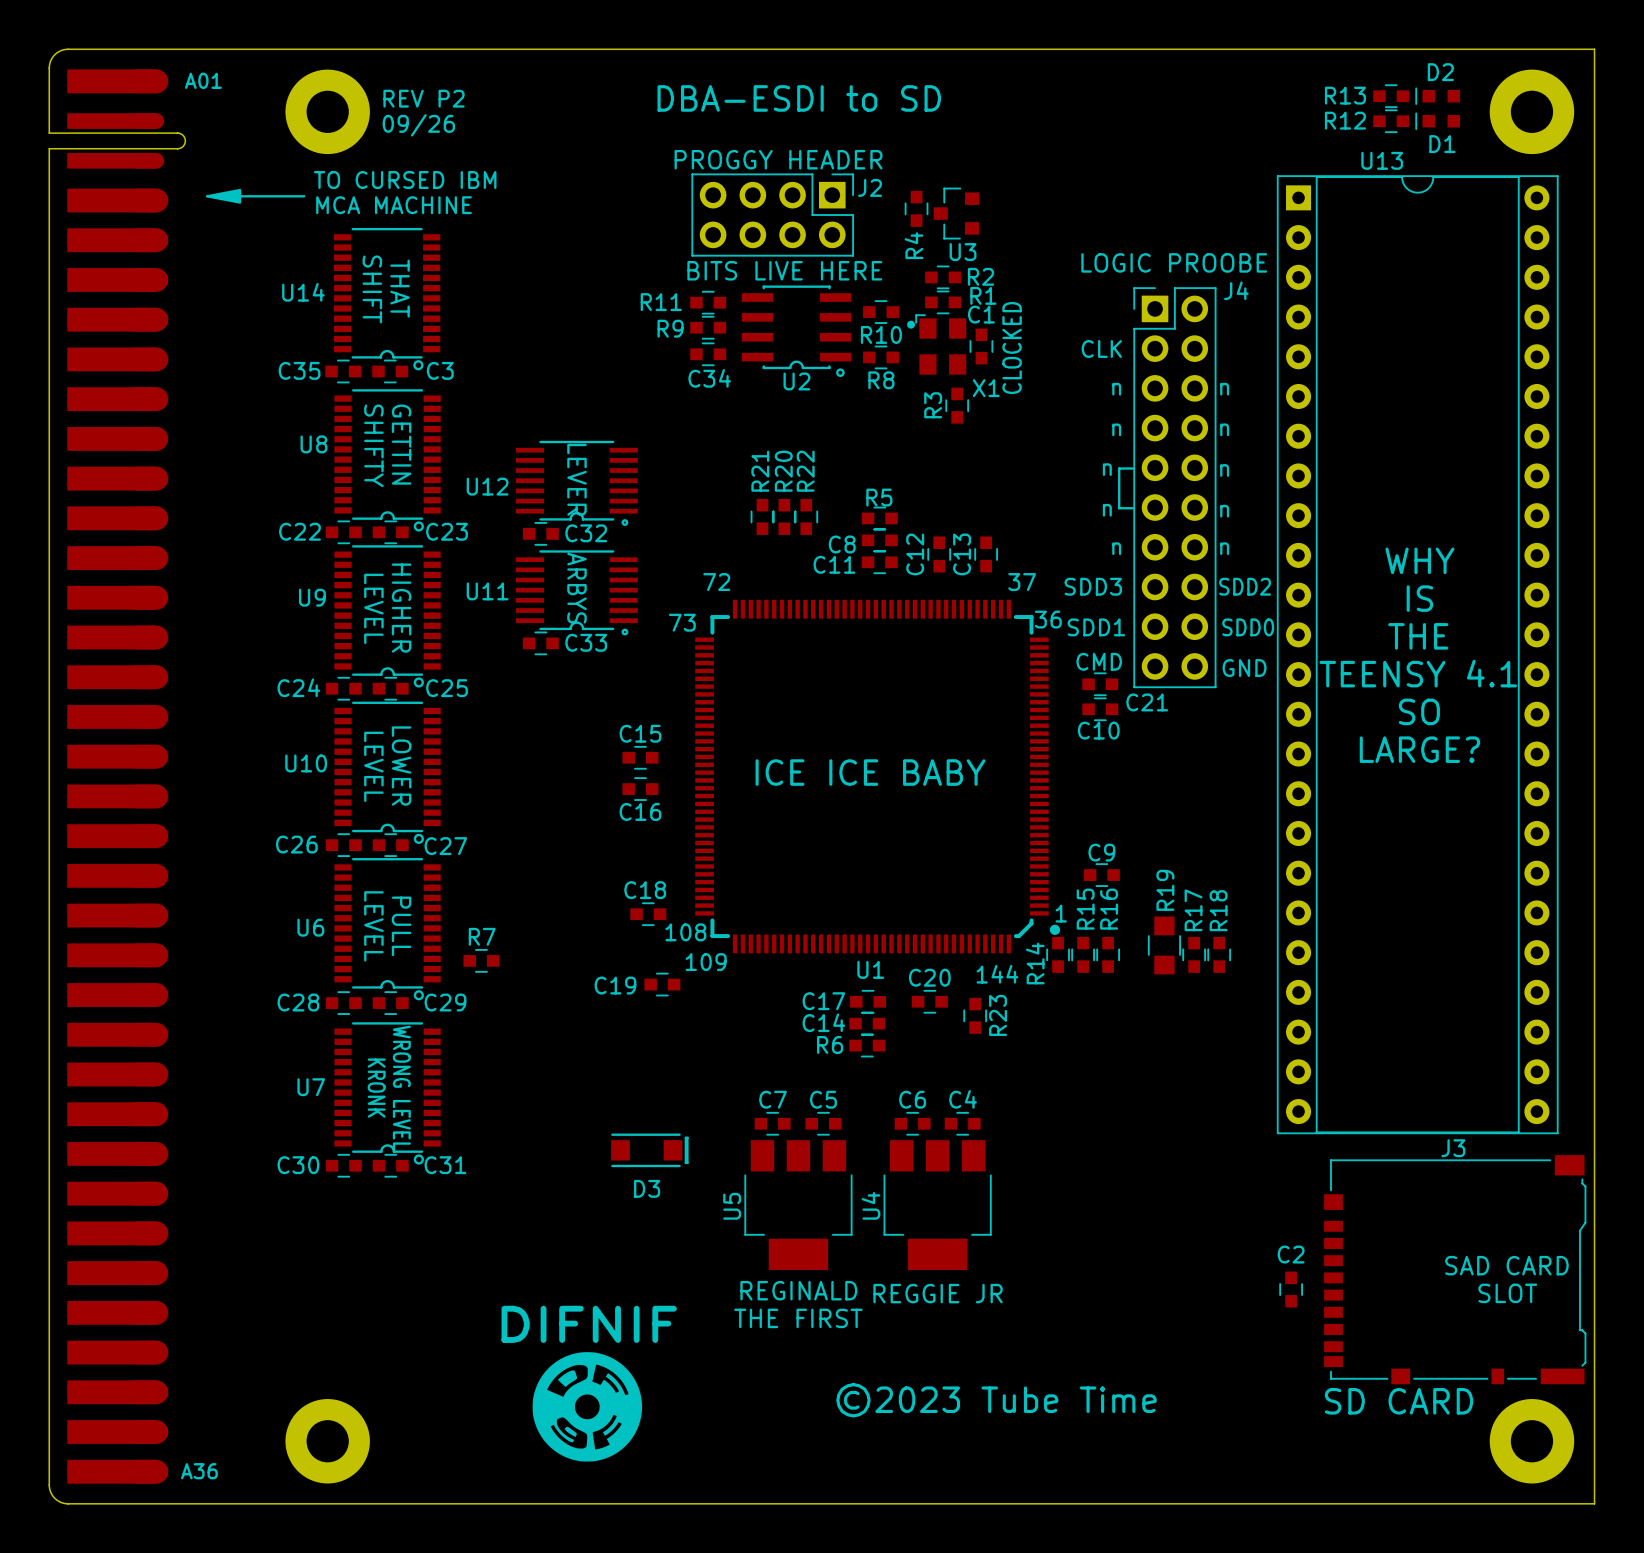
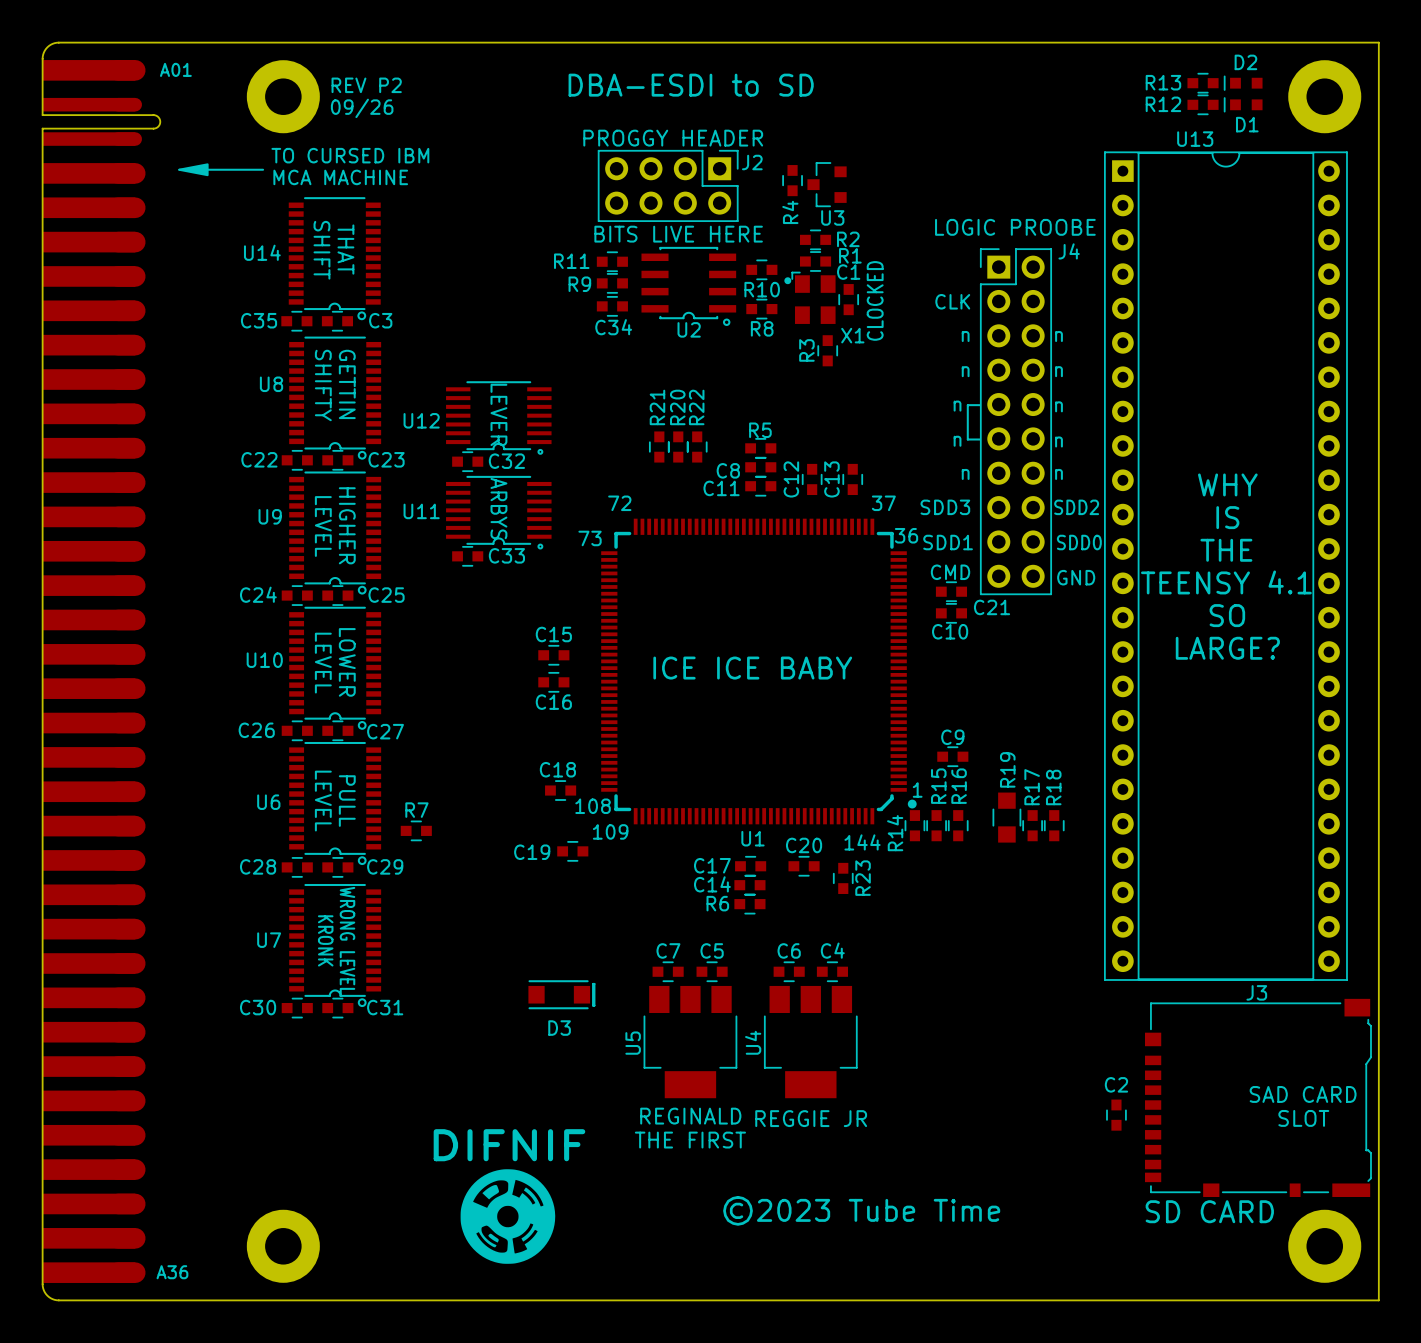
part footprint: [67, 69, 169, 1484] -> [42, 60, 146, 1283]

